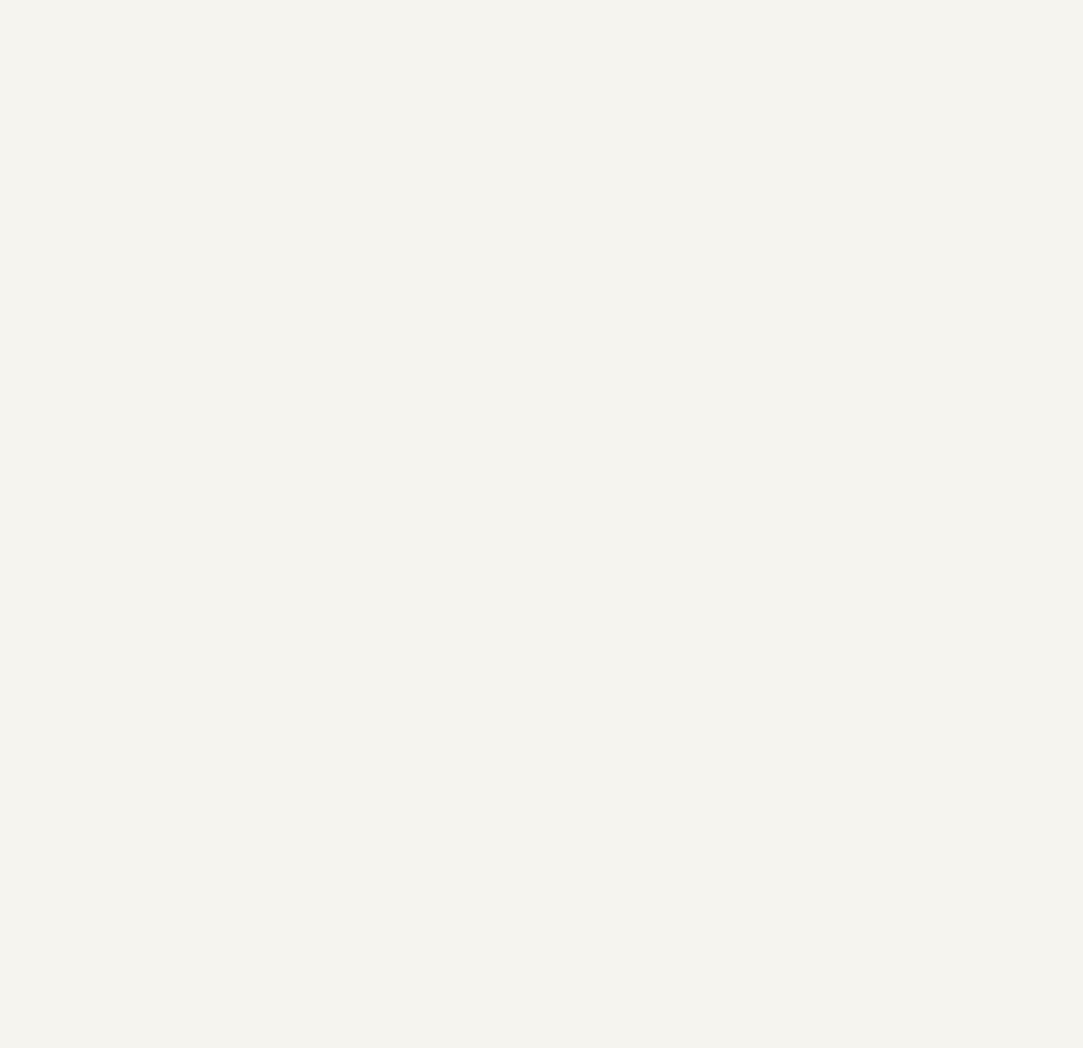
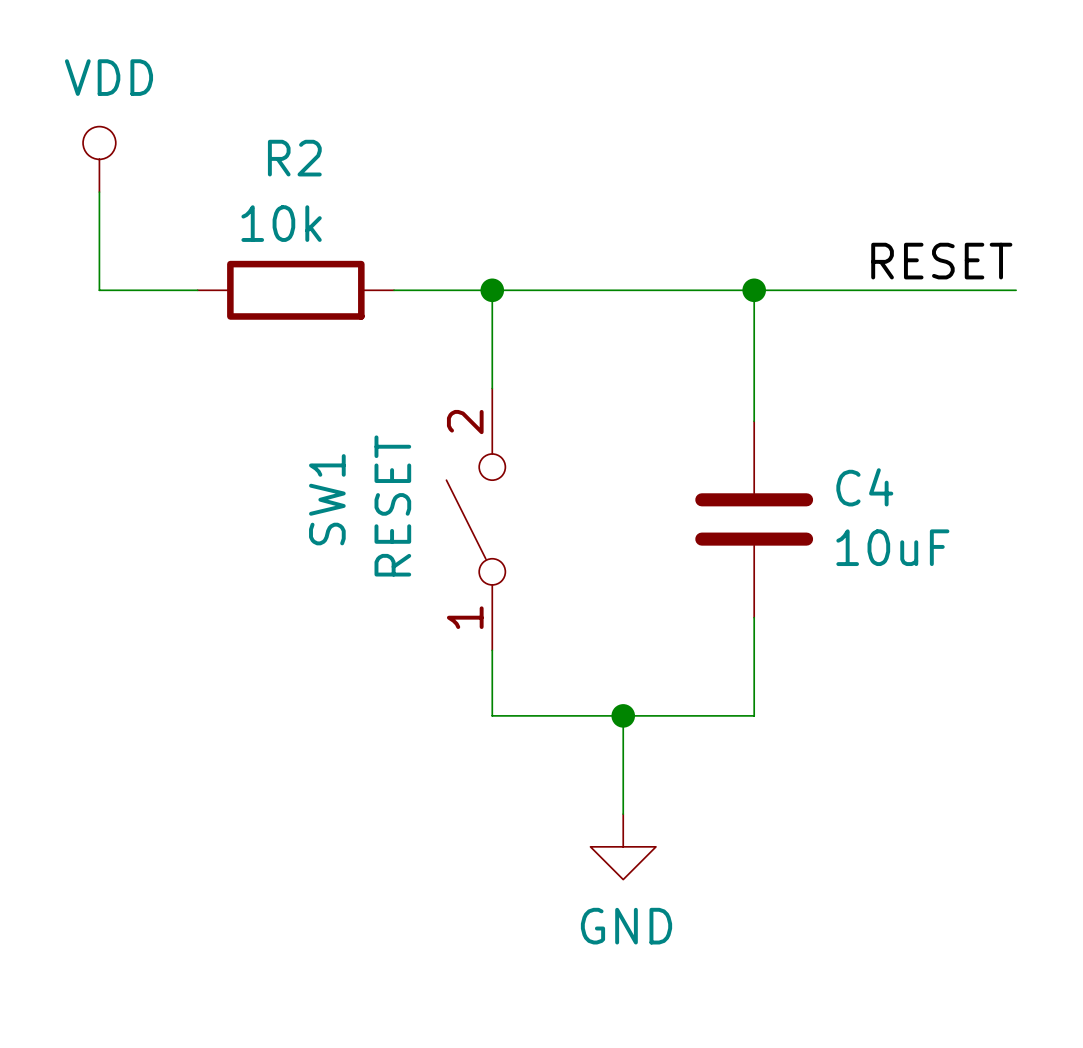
power symbol: none -> VDD (99, 159)
wire: none -> (99, 192) (99, 290) (197, 290)
label: none -> RESET (941, 261)
R2: none -> 10k (295, 290)
wire: none -> (394, 290) (1016, 290)
wire: none -> (492, 290) (492, 388)
junction: none -> (492, 290)
wire: none -> (754, 290) (754, 421)
junction: none -> (754, 290)
SW1: none -> RESET (475, 519)
C4: none -> 10uF (754, 519)
wire: none -> (754, 617) (754, 715) (492, 715) (492, 650)
wire: none -> (623, 715) (623, 814)
junction: none -> (623, 715)
power symbol: none -> GND (623, 846)

